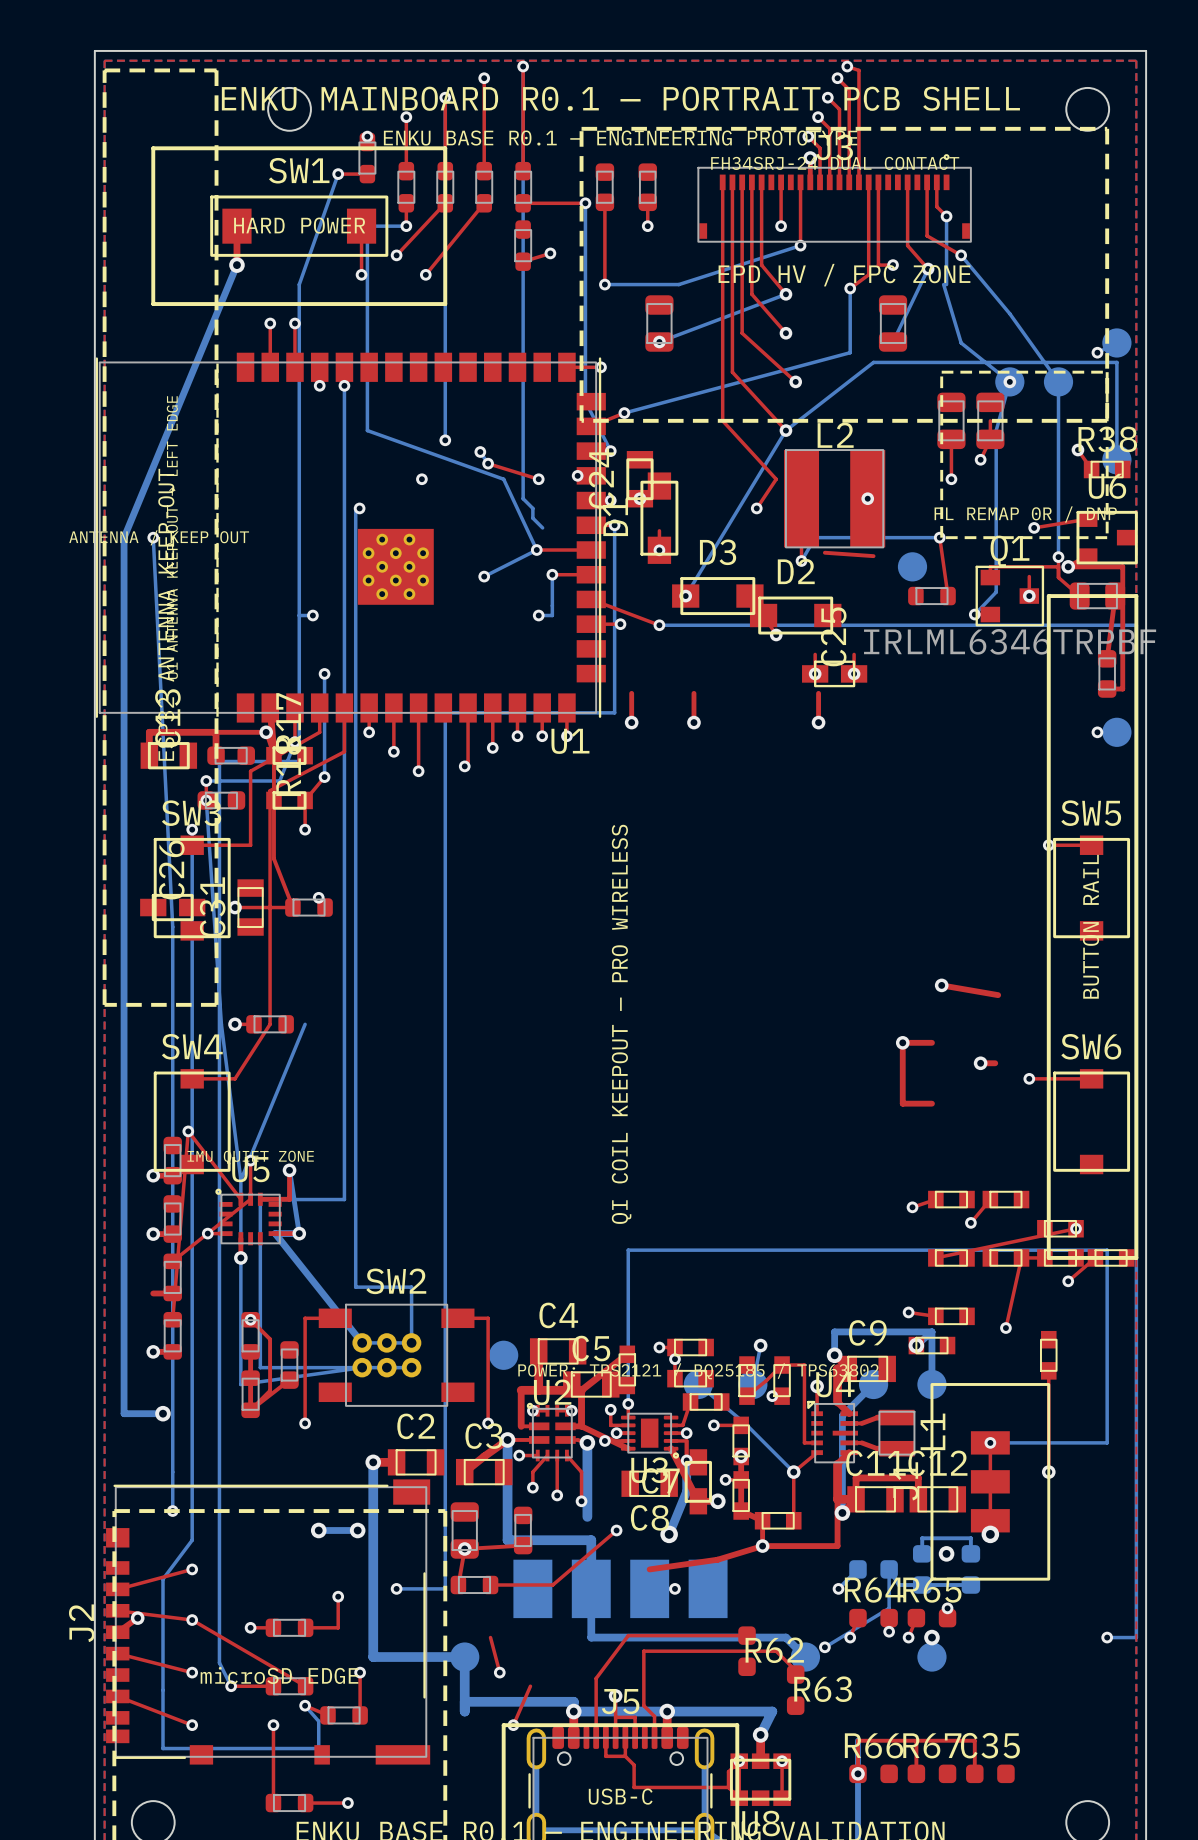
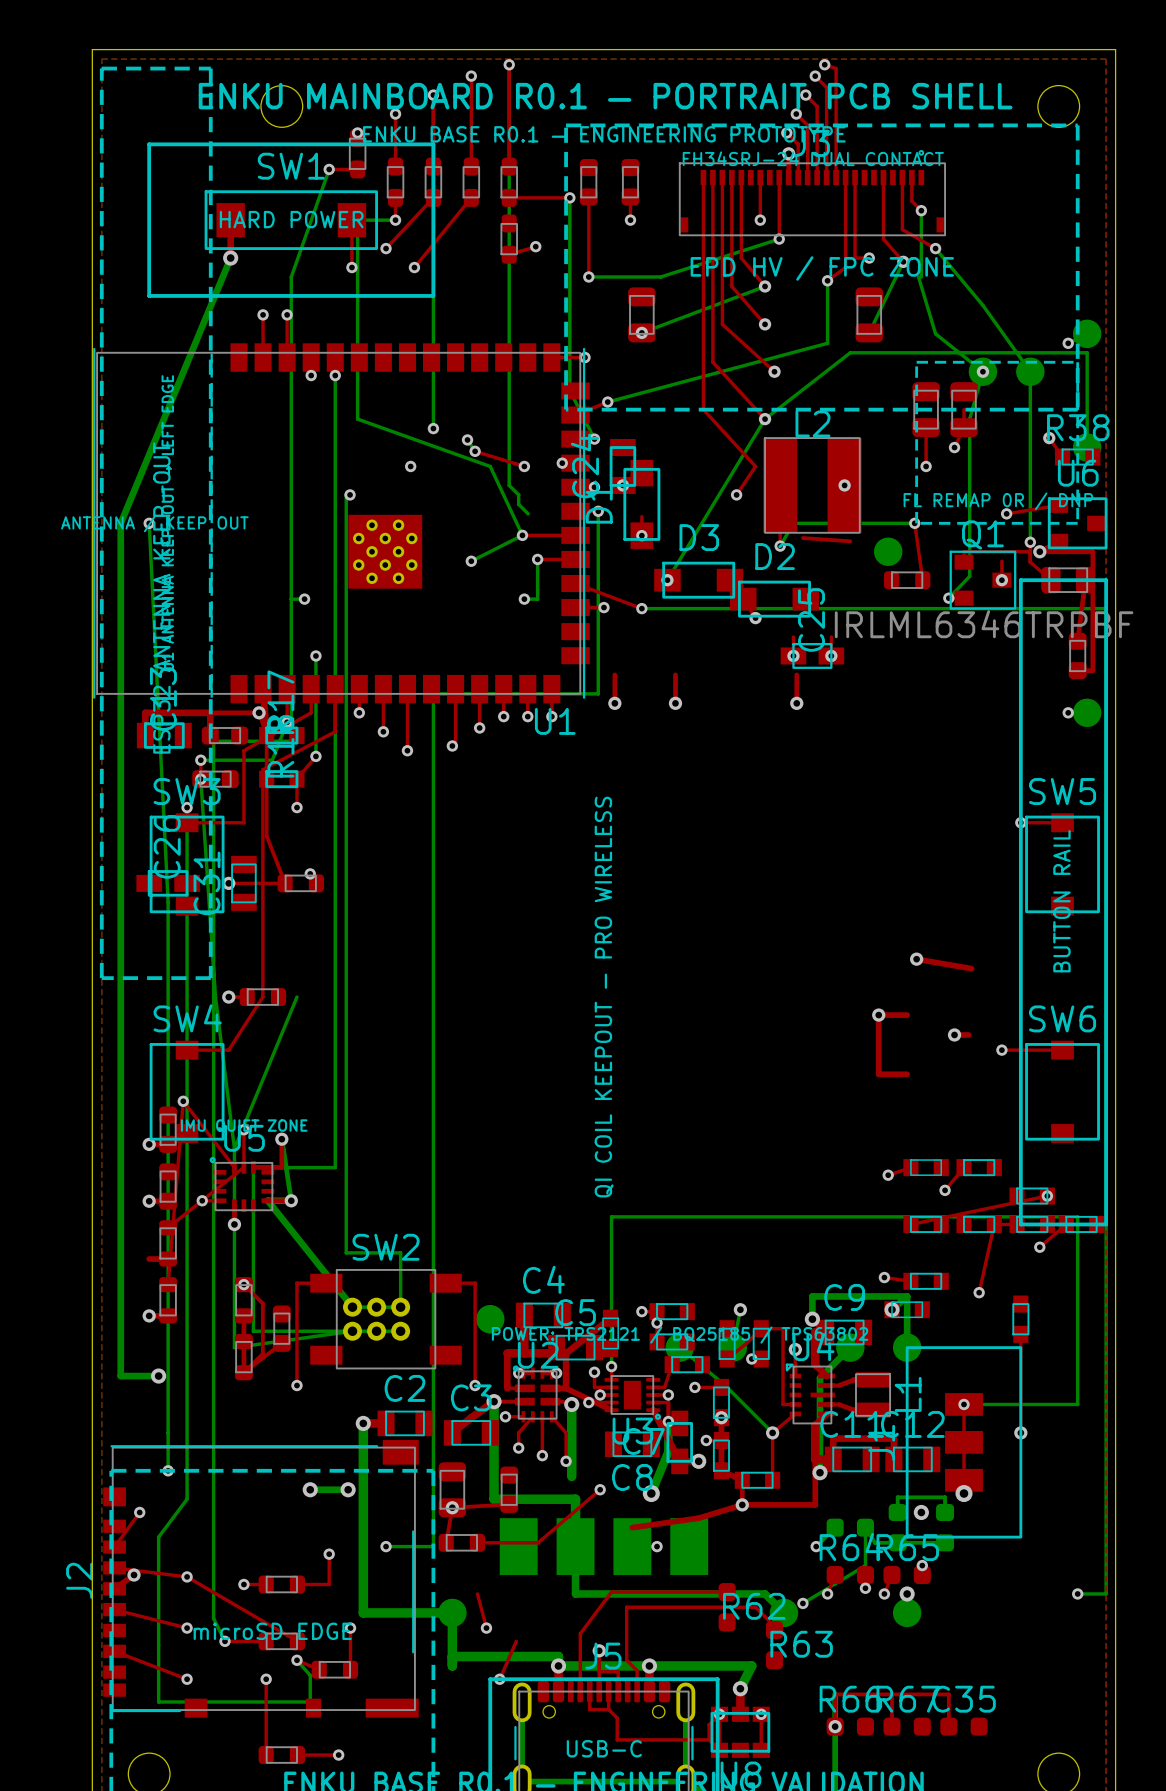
top track: (192, 1569) (117, 1589) -> (139, 1512) (114, 1547)
via position: (192, 1569) -> (139, 1512)

